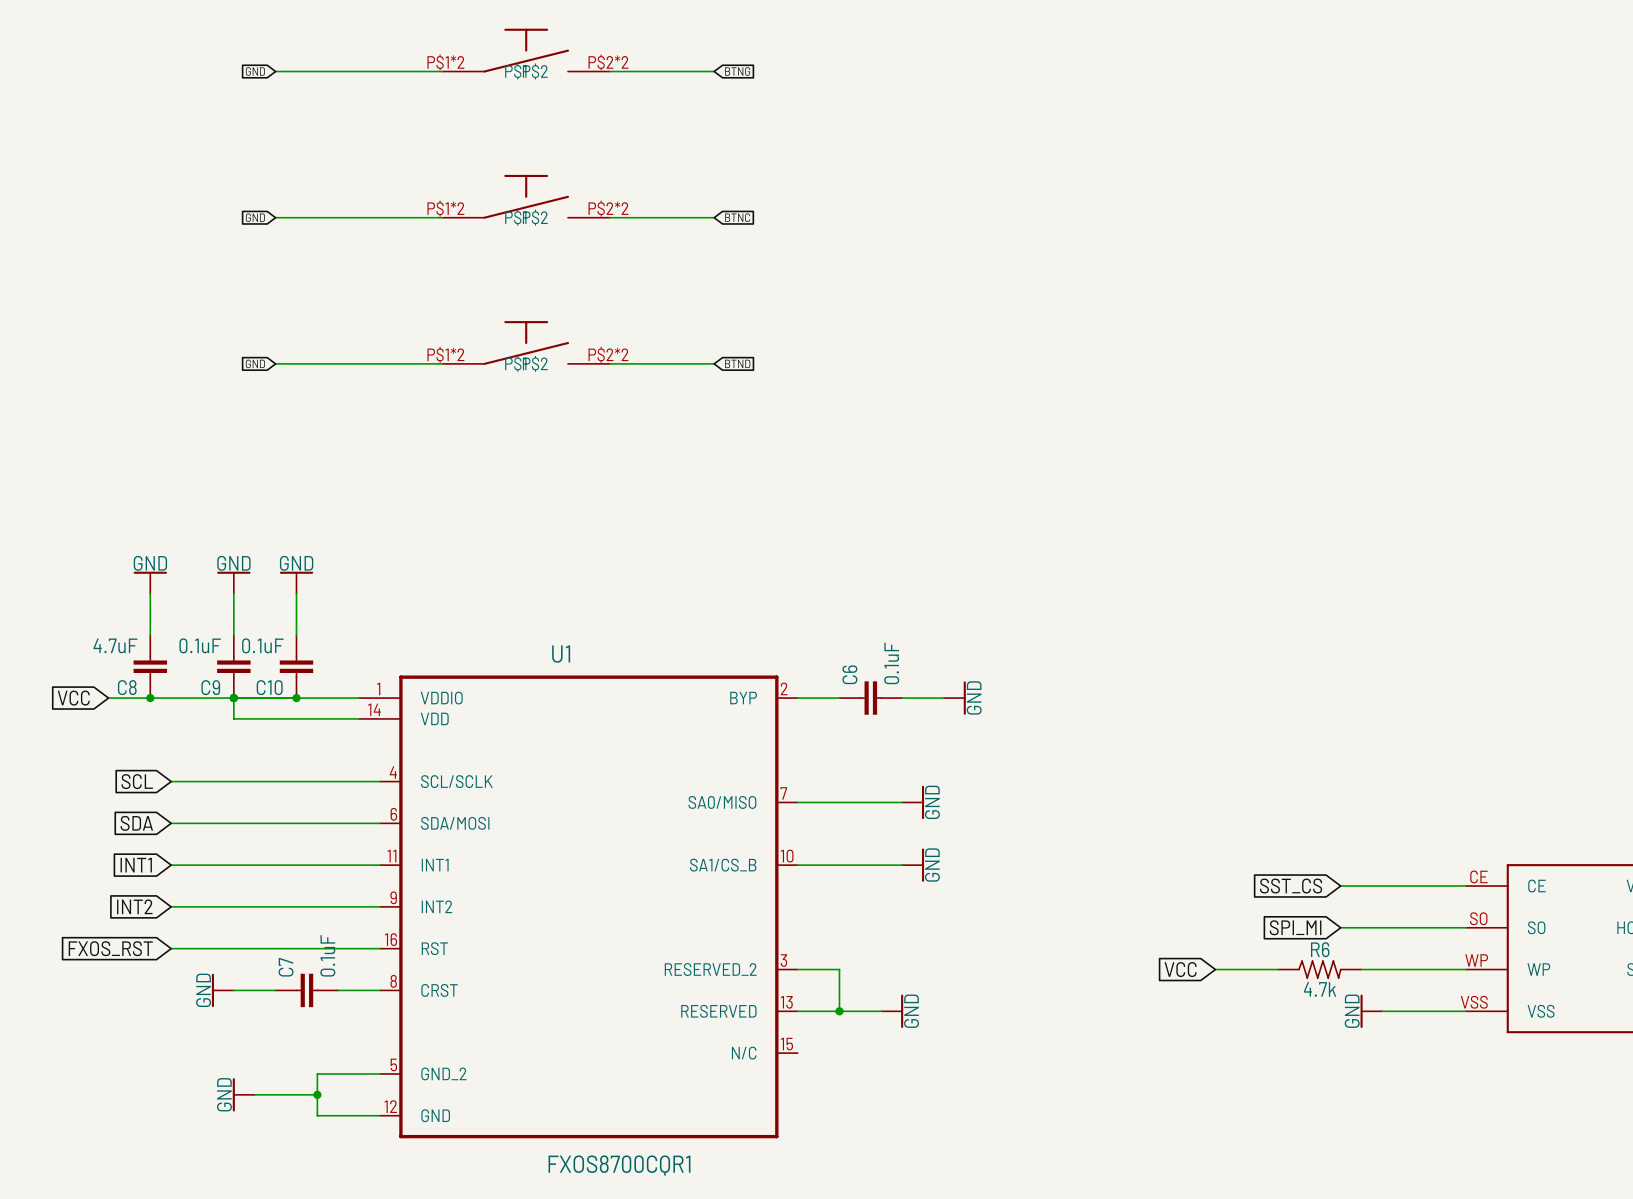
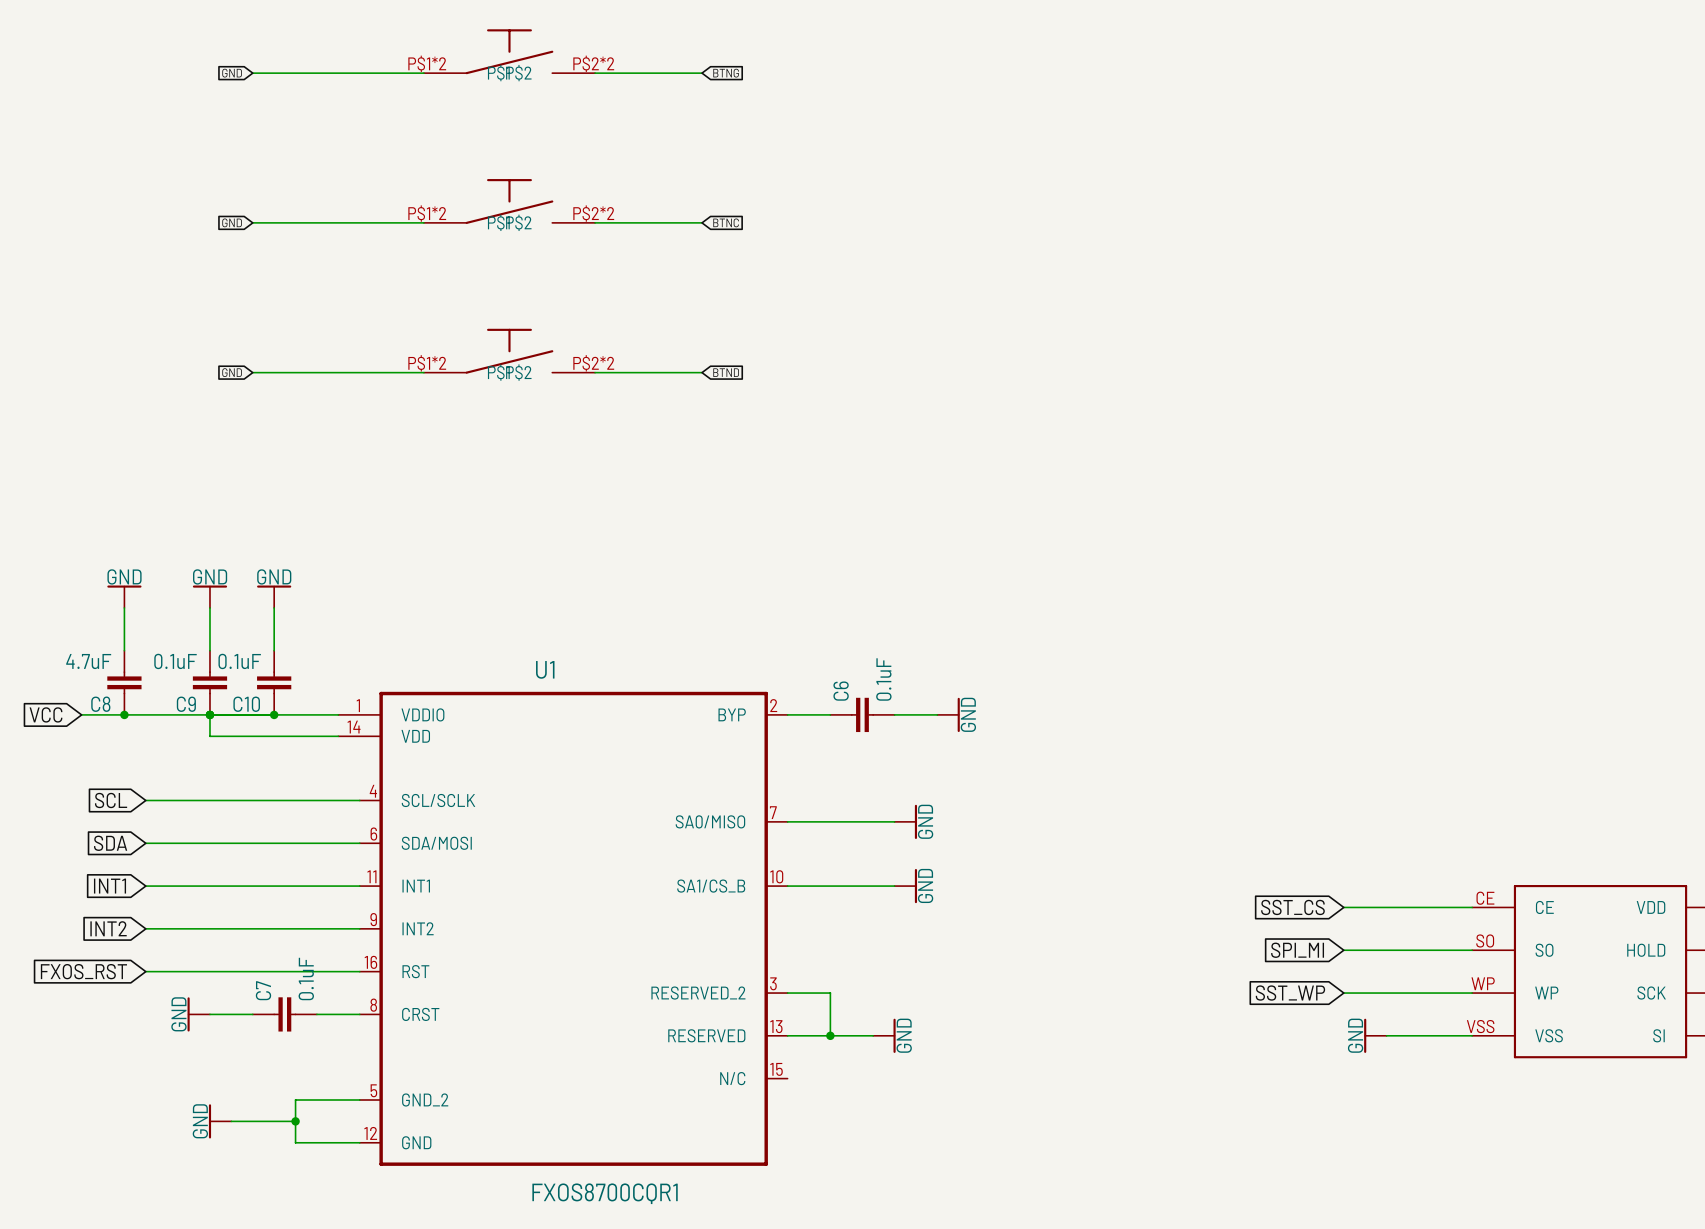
global label: VCC (1180, 969) -> none
wire: (1215, 969) (1278, 969) -> none
global label: none -> SST_WP (1290, 993)
R6: 4.7k (1319, 969) -> none

